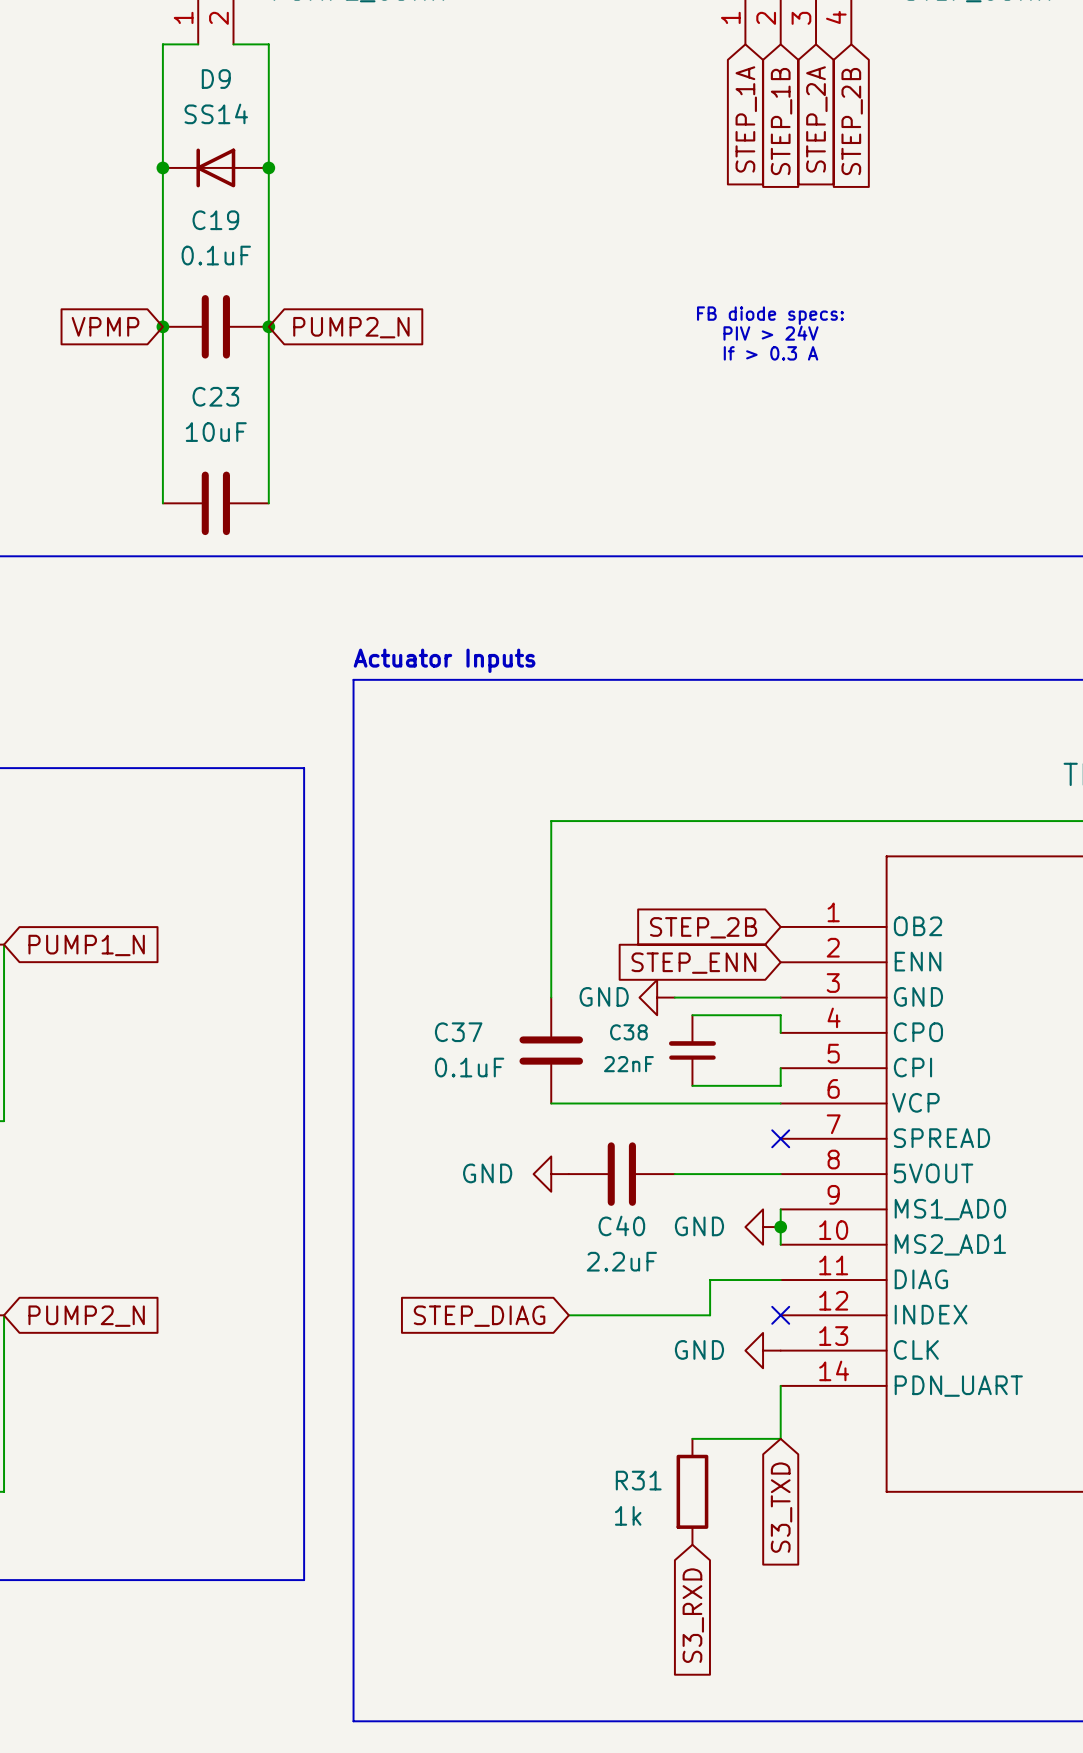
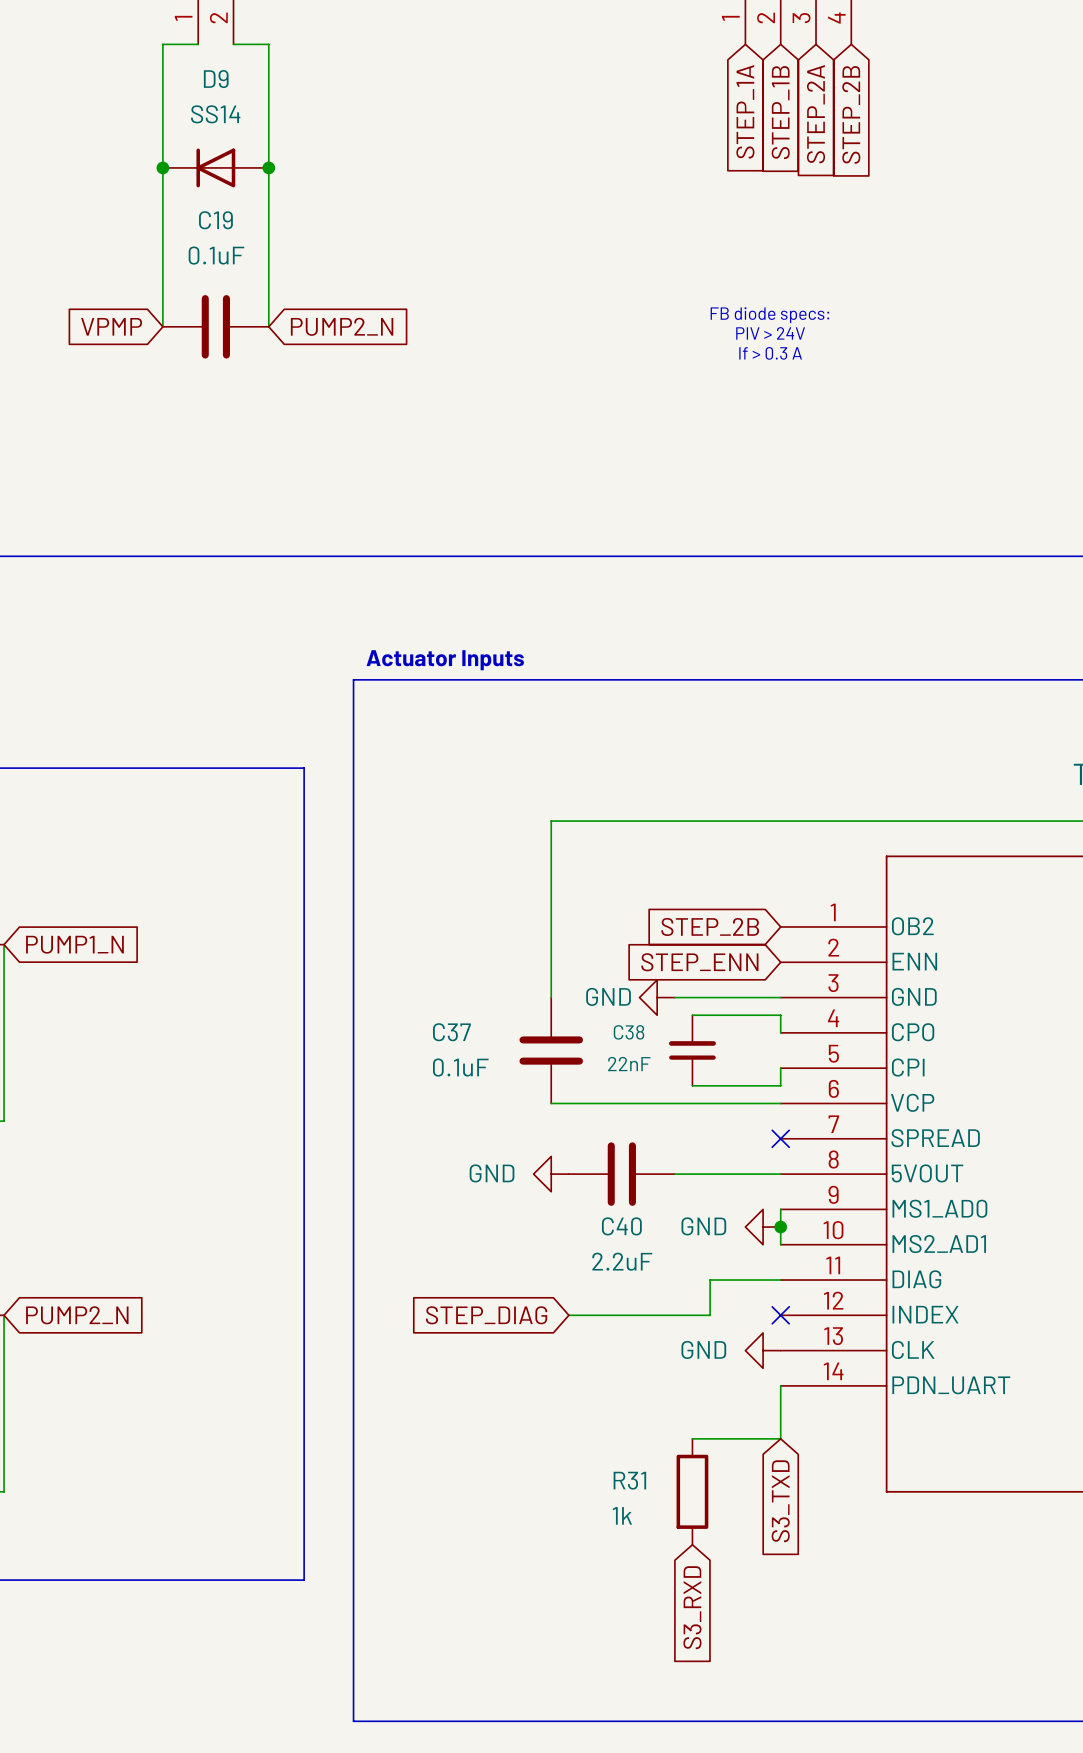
wire: (162, 326) (162, 503) -> none
junction: (162, 326) -> none
wire: (268, 326) (268, 503) -> none
junction: (268, 326) -> none
C23: 10uF (215, 503) -> none

